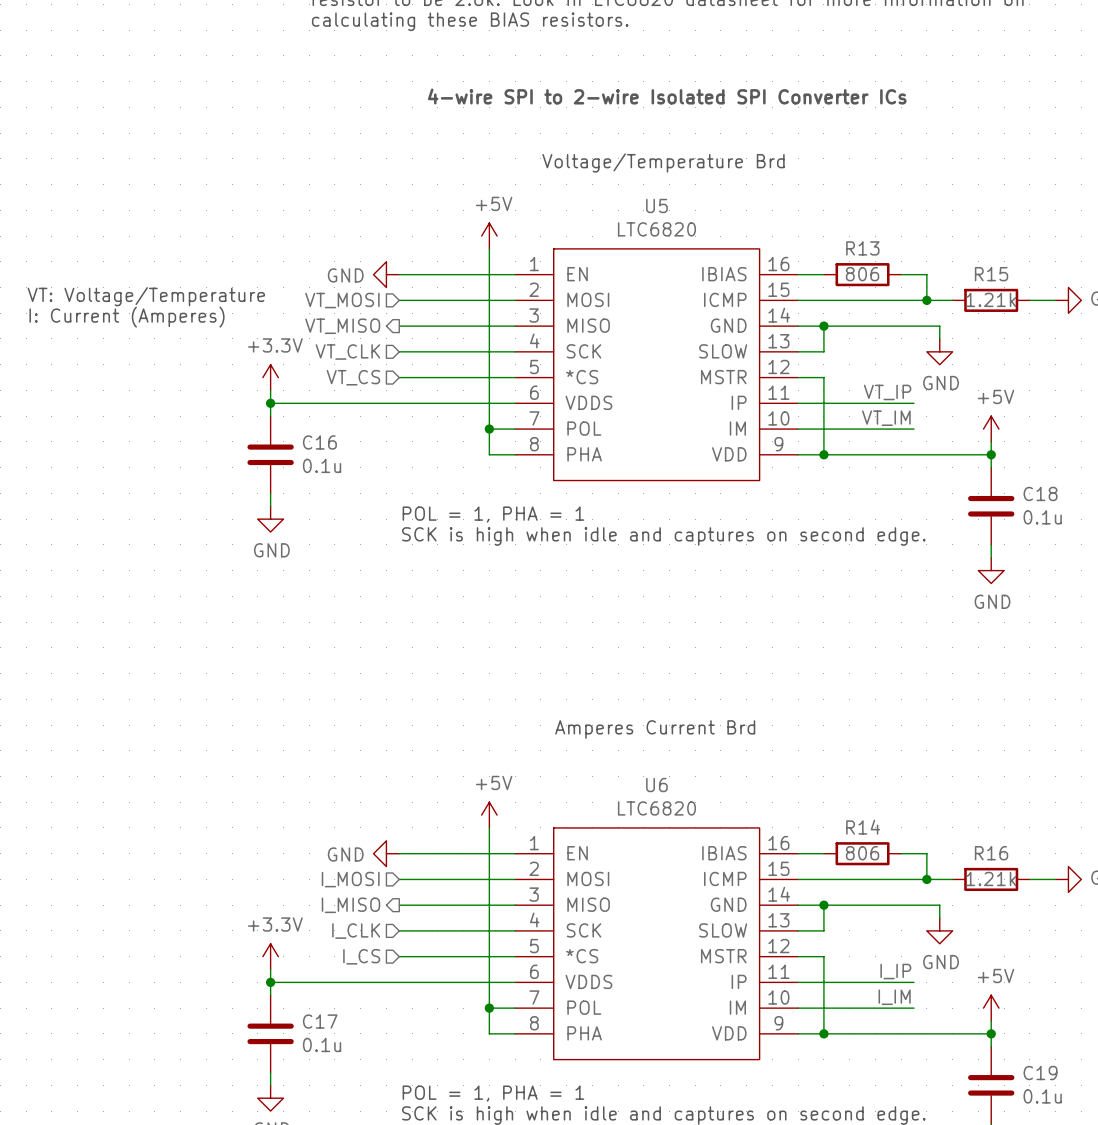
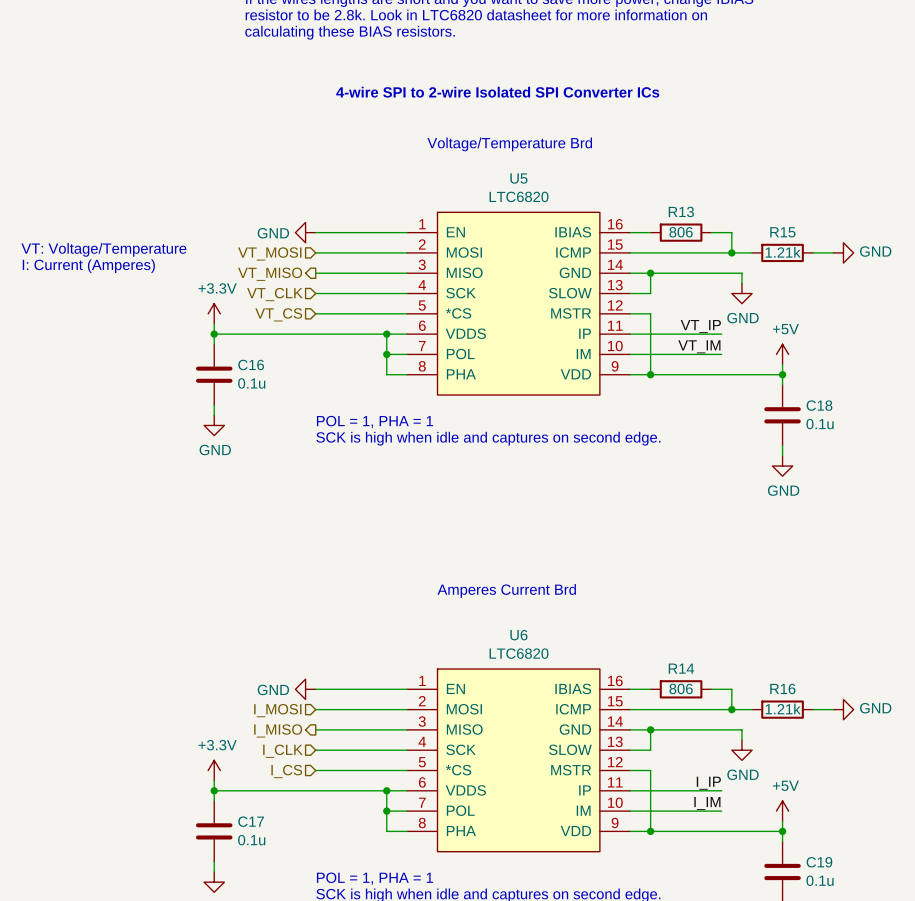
power symbol: +5V (489, 236) -> none
wire: (489, 248) (489, 403) -> none
junction: none -> (386, 334)
power symbol: +5V (489, 815) -> none
wire: (489, 827) (489, 982) -> none
junction: none -> (386, 790)

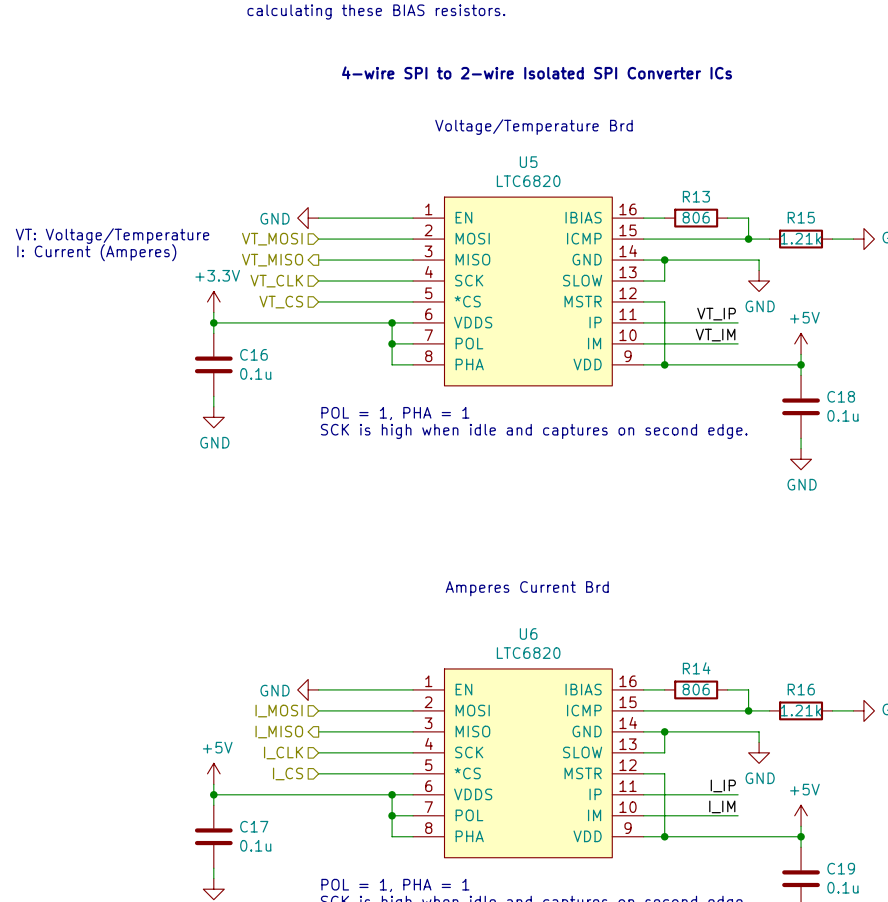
power symbol: +3.3V (214, 770) -> +5V (213, 773)

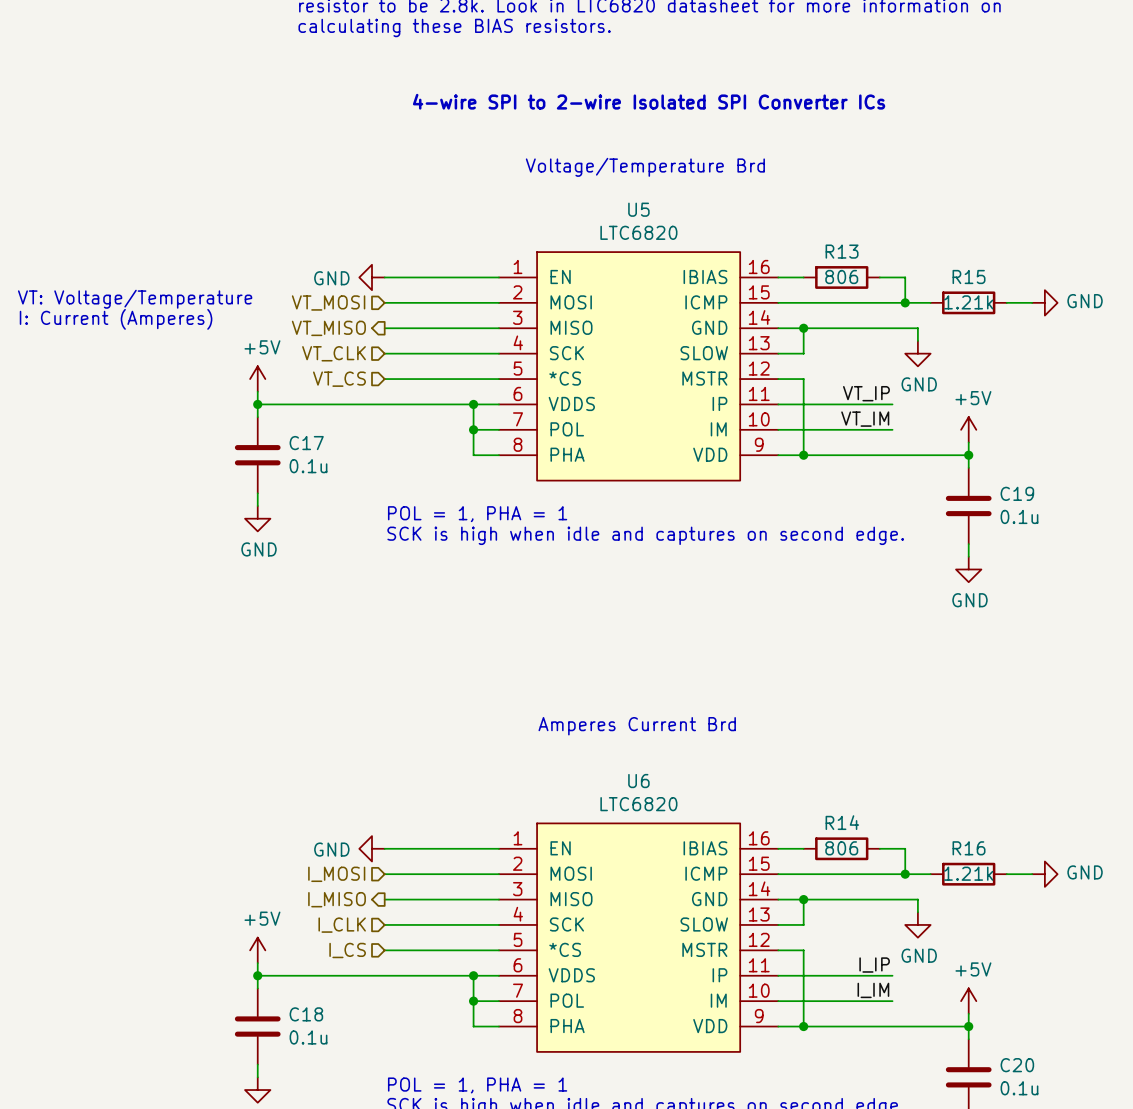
power symbol: +3.3V (213, 301) -> +5V (257, 379)
C16 name: C16 (253, 354) -> C17 (306, 443)
C18 name: C18 (841, 396) -> C19 (1017, 493)
C17 name: C17 (254, 826) -> C18 (306, 1014)
C19 name: C19 (841, 868) -> C20 (1017, 1065)

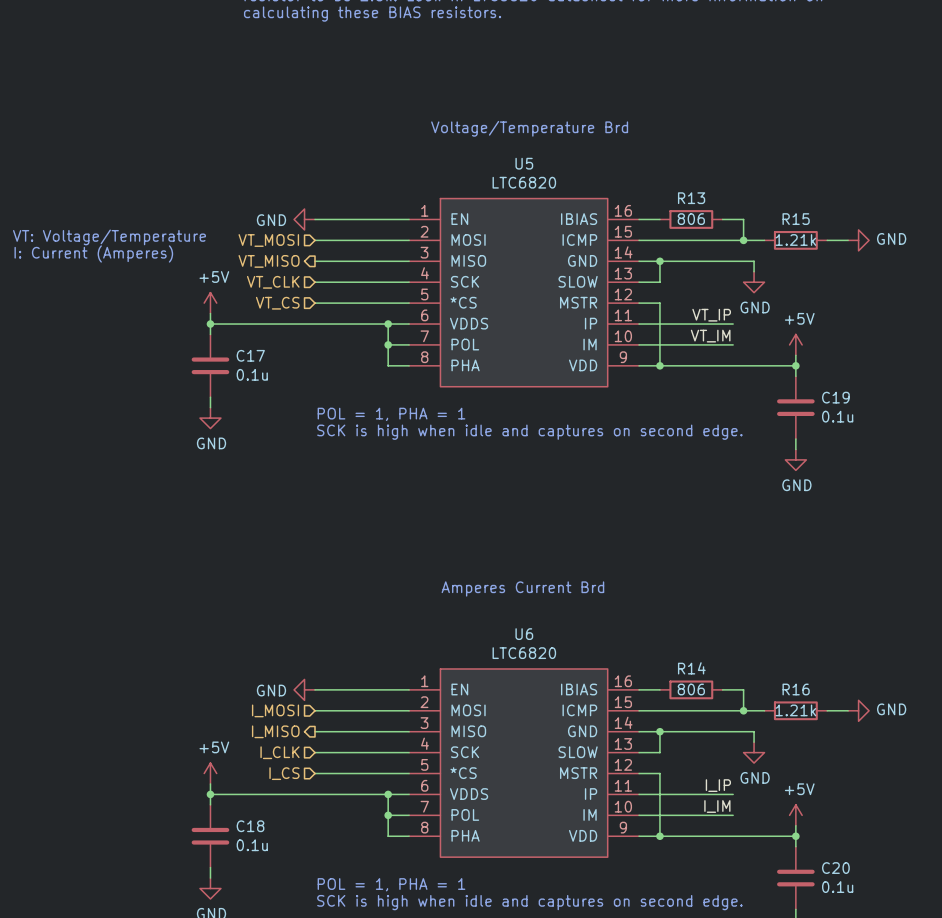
text: 4-wire SPI to 2-wire Isolated SPI Converter ICs (649, 101) -> none

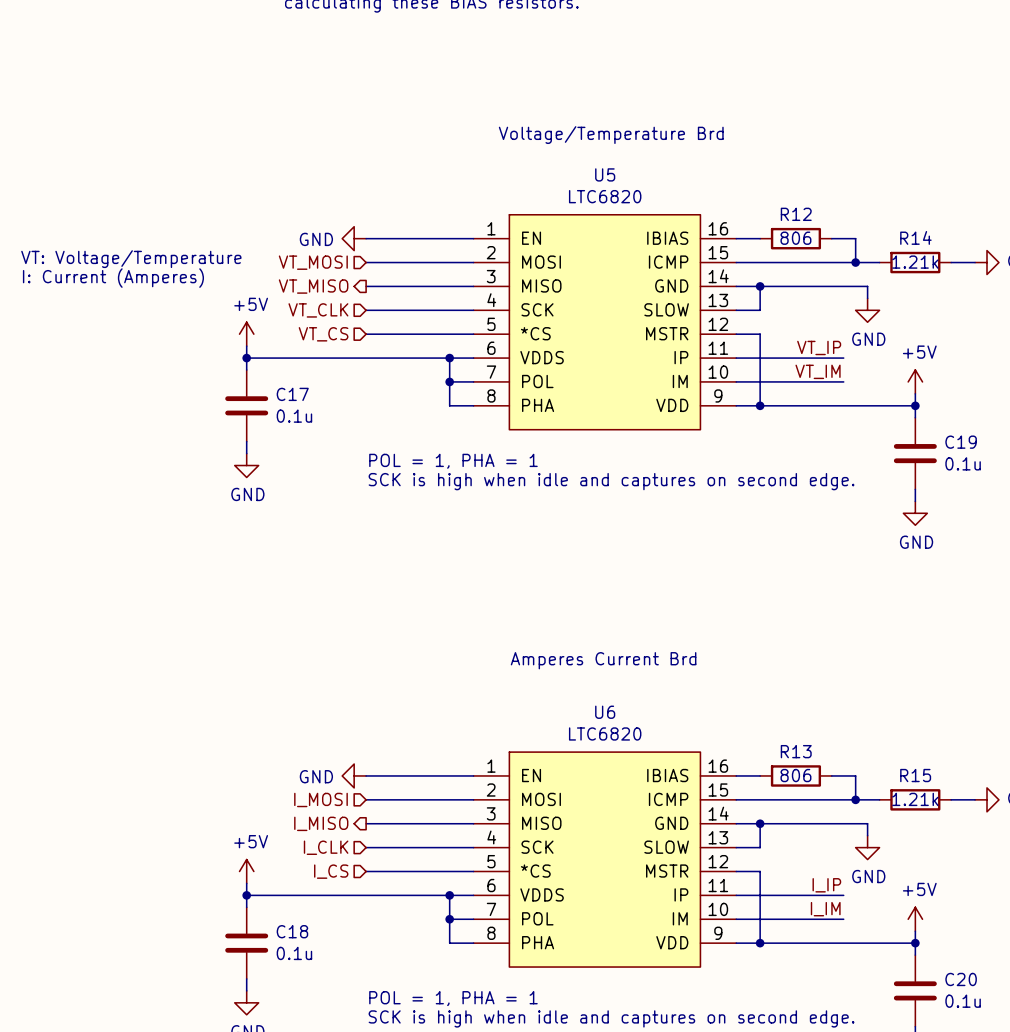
R13 name: R13 (691, 198) -> R12 (796, 214)
R15 name: R15 (796, 219) -> R14 (915, 237)
R14 name: R14 (691, 668) -> R13 (796, 751)
R16 name: R16 (796, 689) -> R15 (915, 775)

